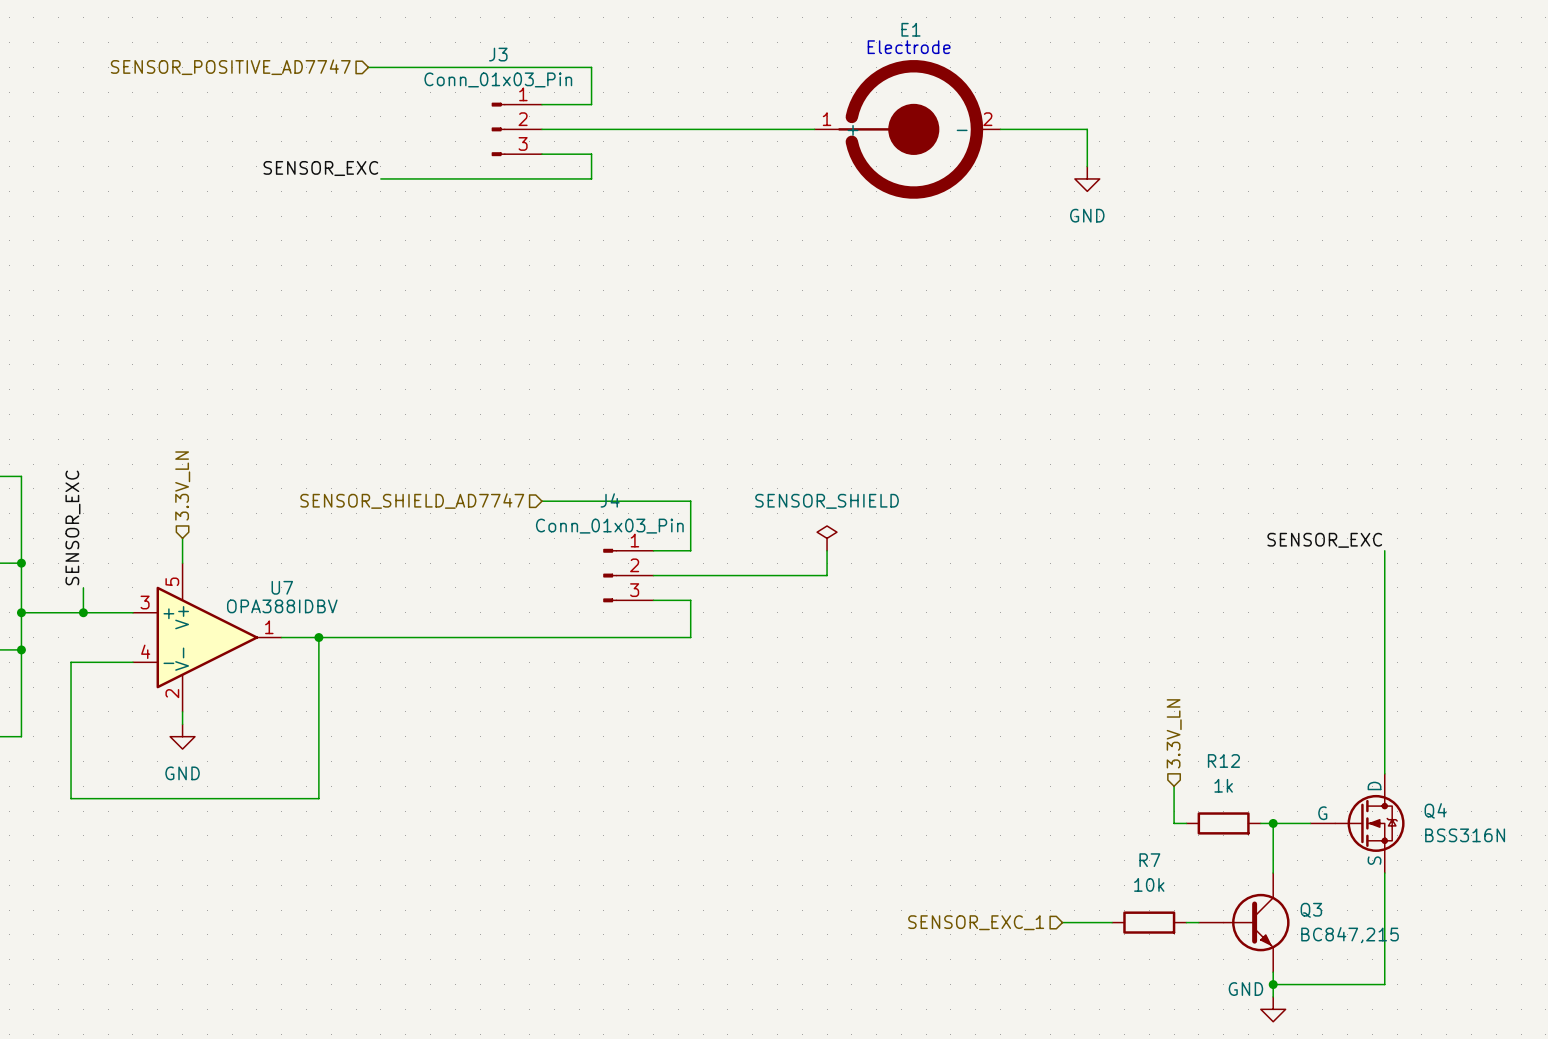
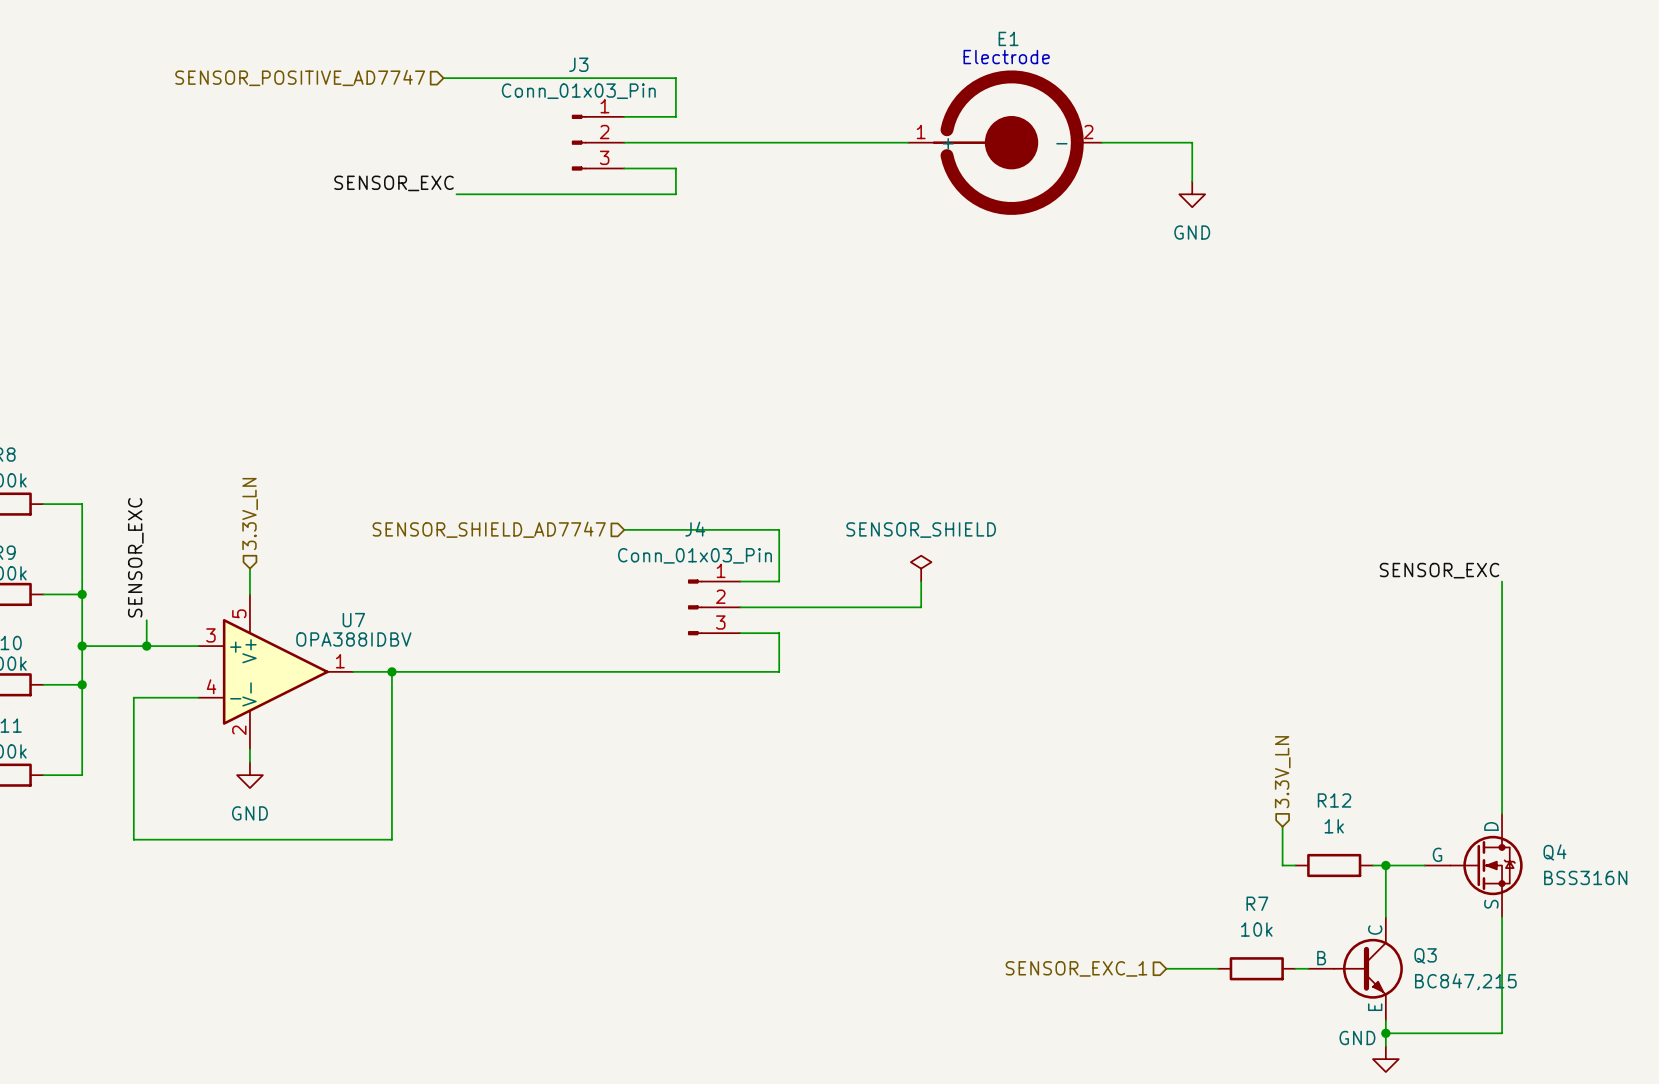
Q3 symbol: [1198, 873, 1290, 973] -> [1308, 917, 1403, 1021]

